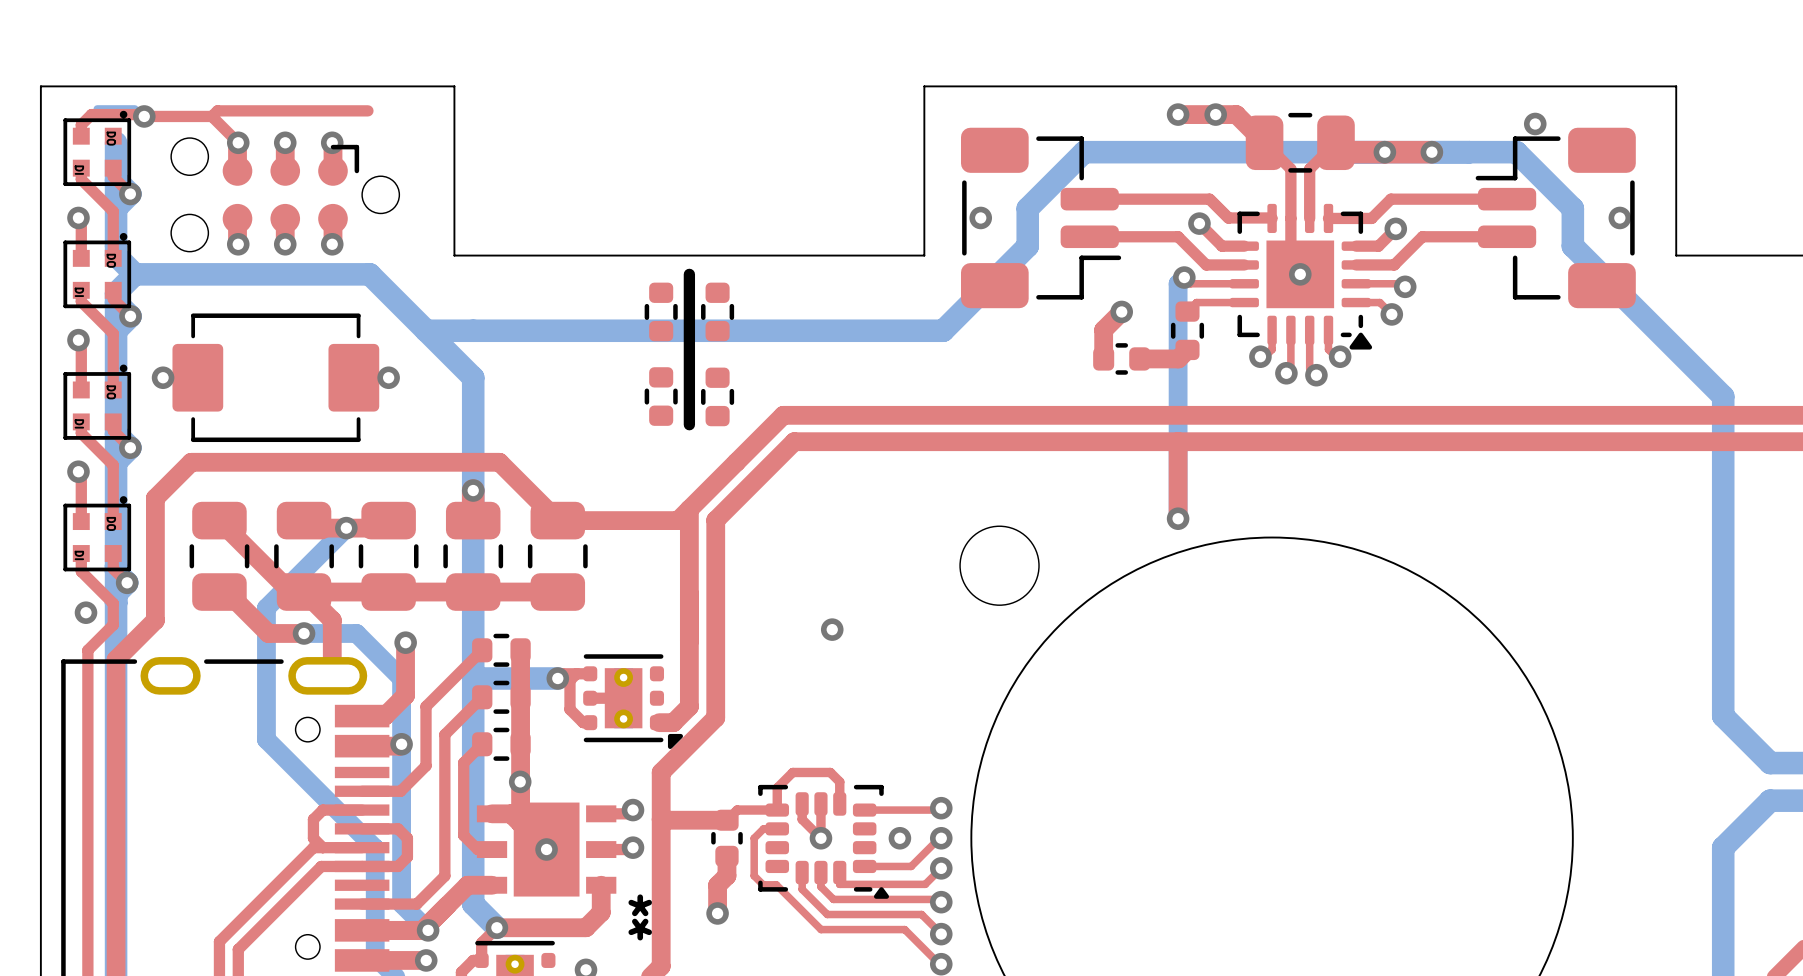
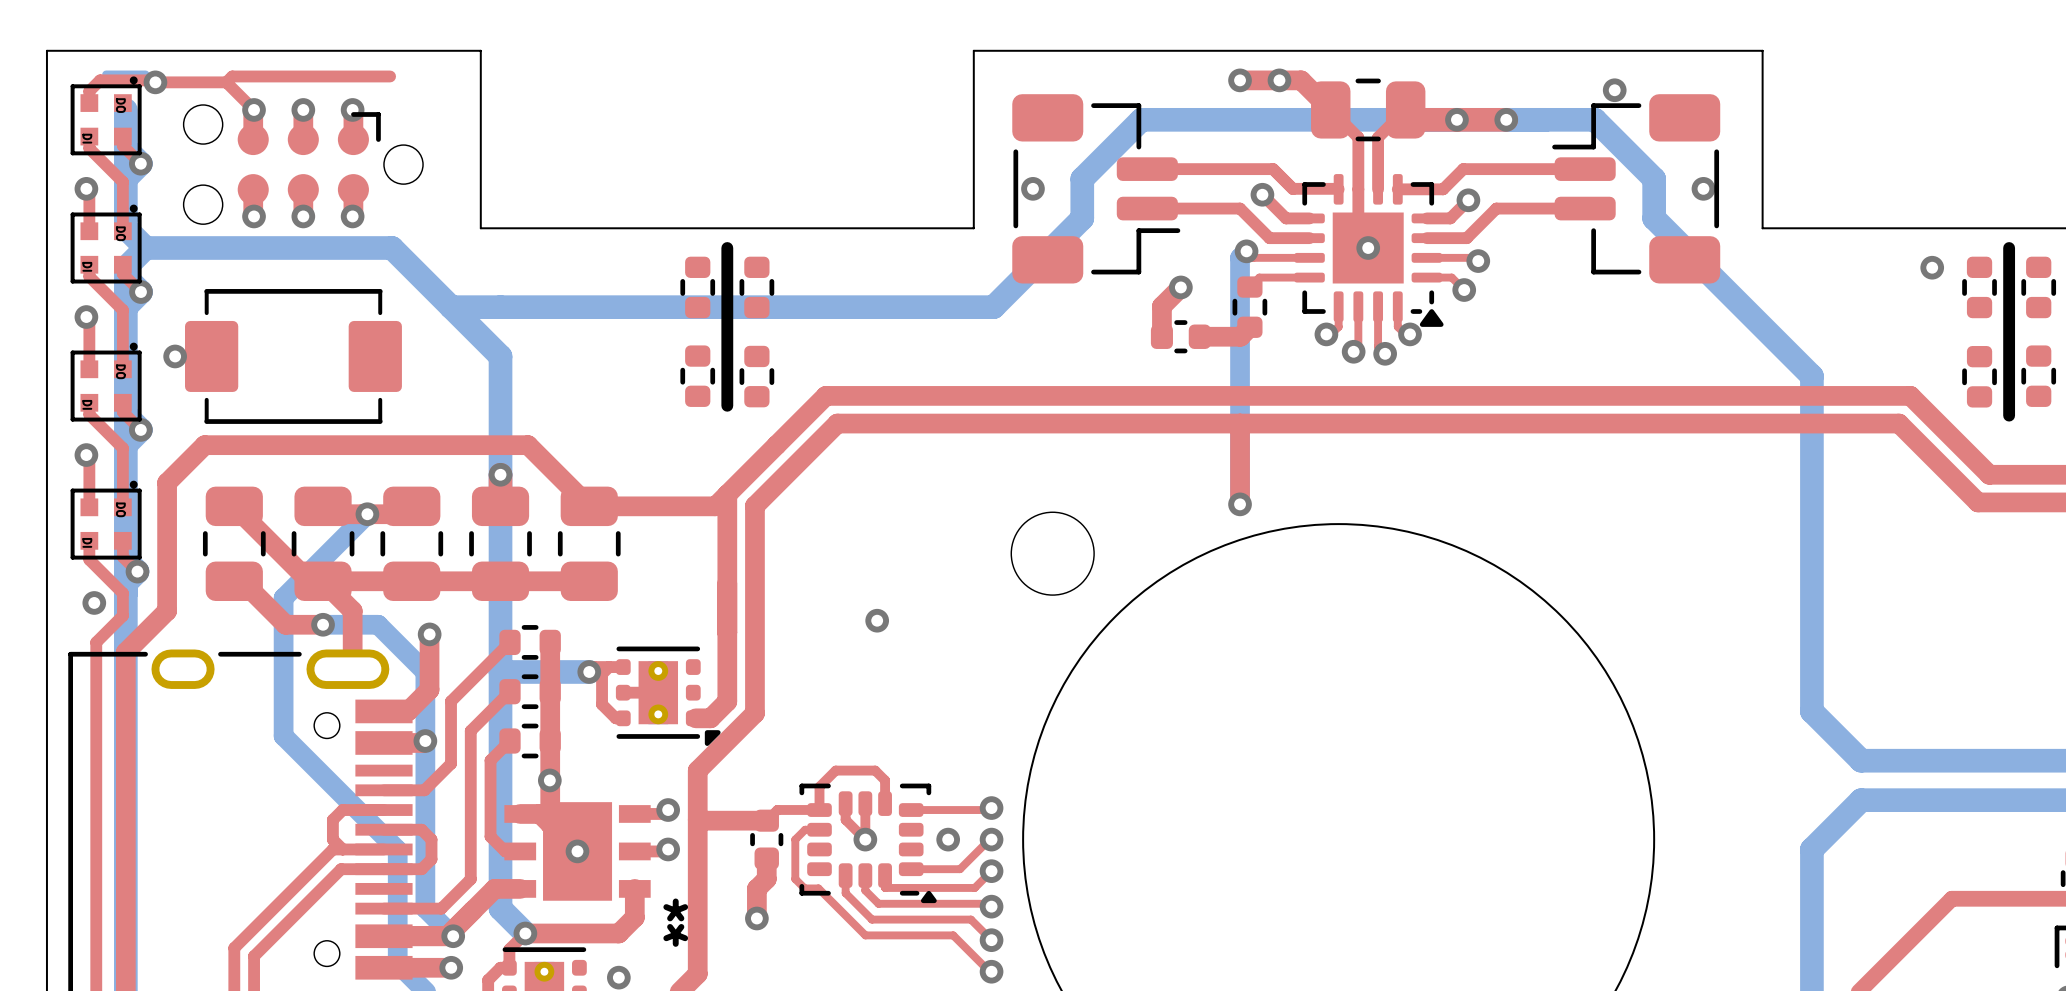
via: (388, 377) -> none

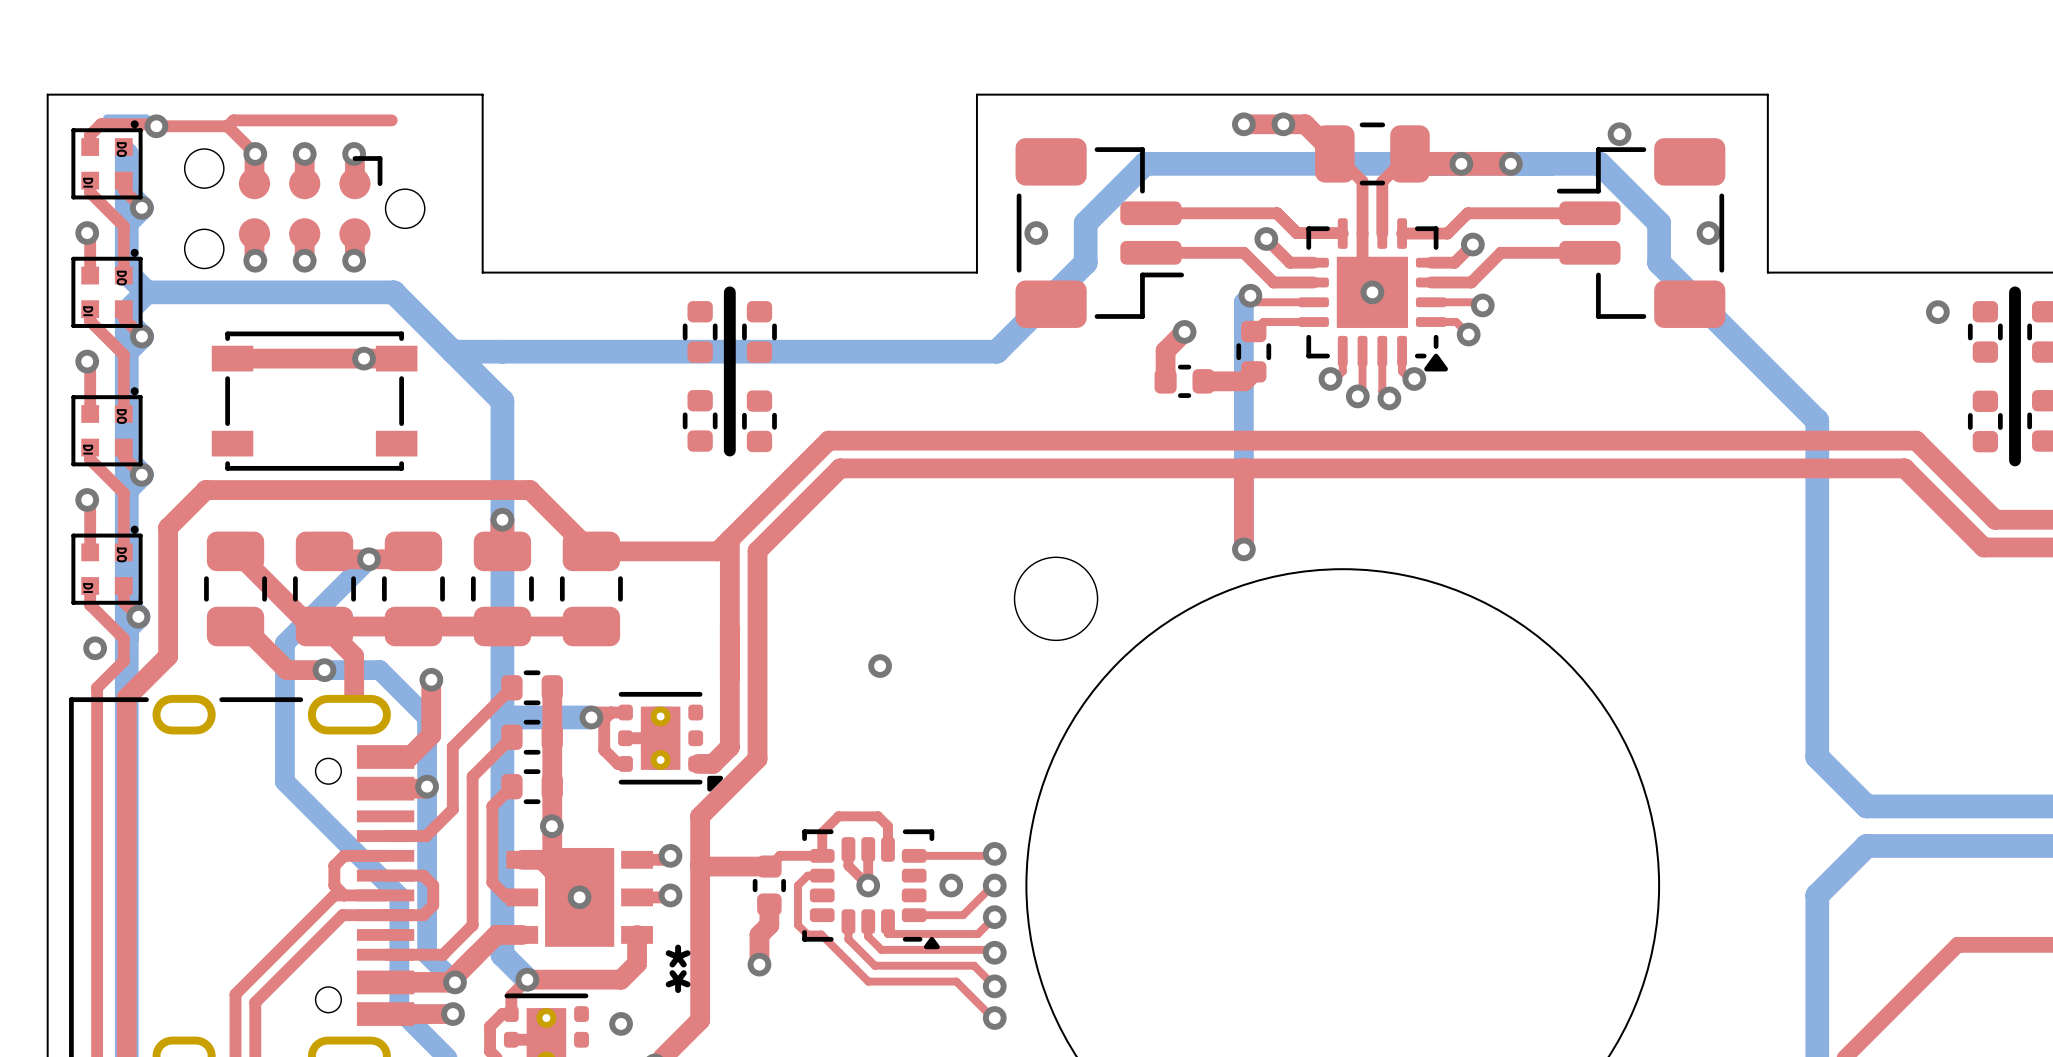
part footprint: [185, 289, 402, 424] -> [211, 331, 418, 471]
top track: none -> (232, 358) (396, 358)
via position: (175, 356) -> (364, 358)

